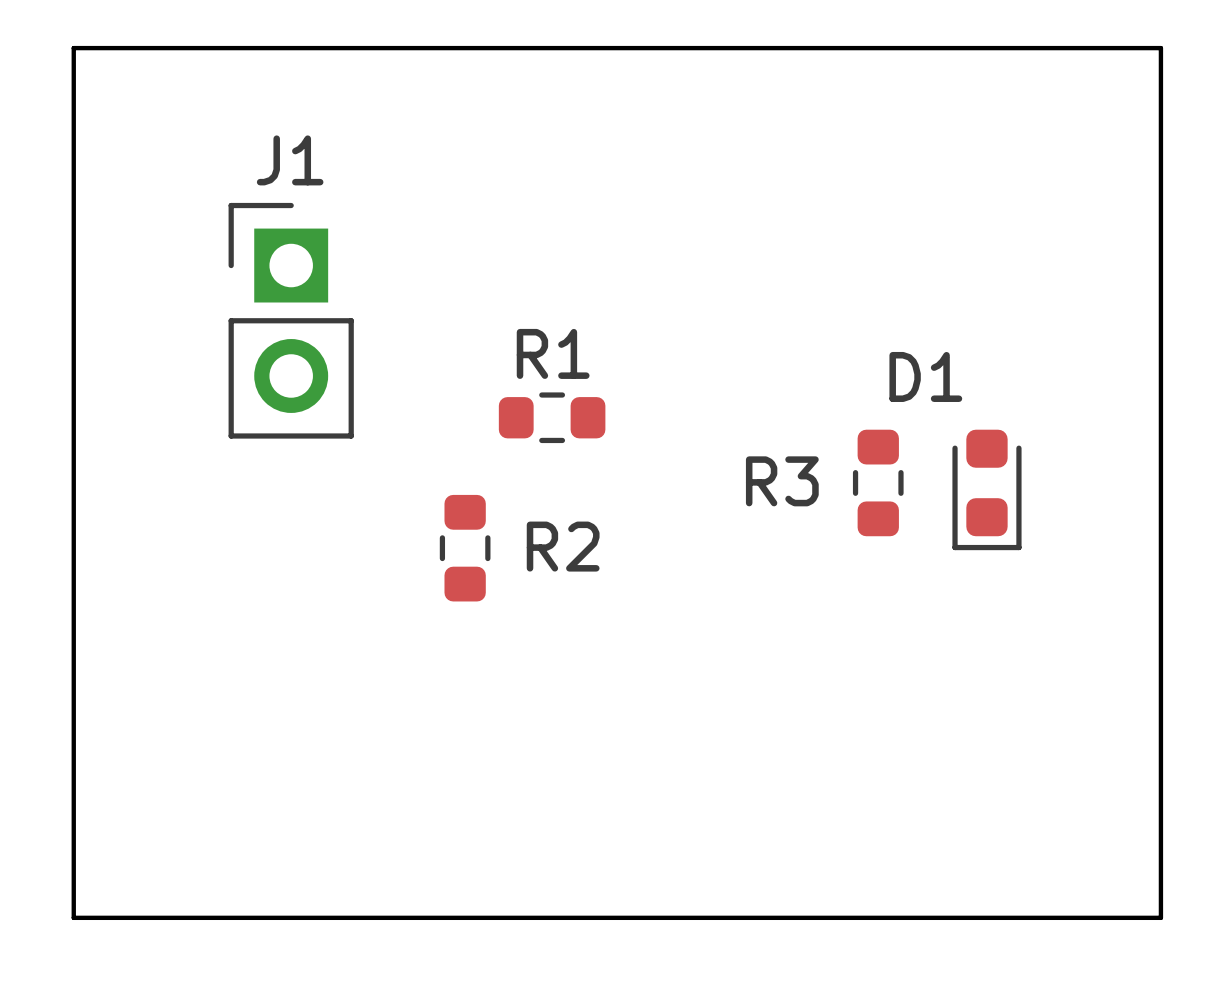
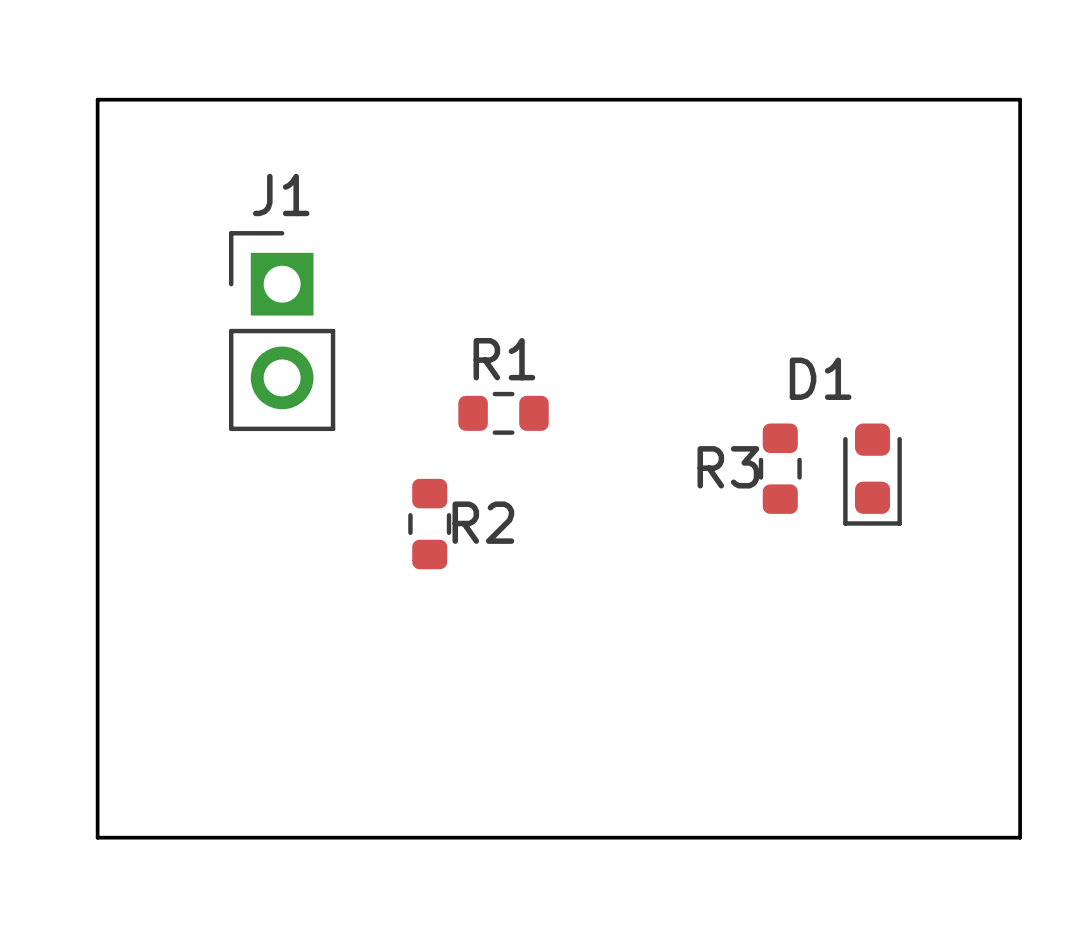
R3 name position: R3 (782, 481) -> R3 (728, 467)
R2 name position: R2 (563, 546) -> R2 (483, 522)

